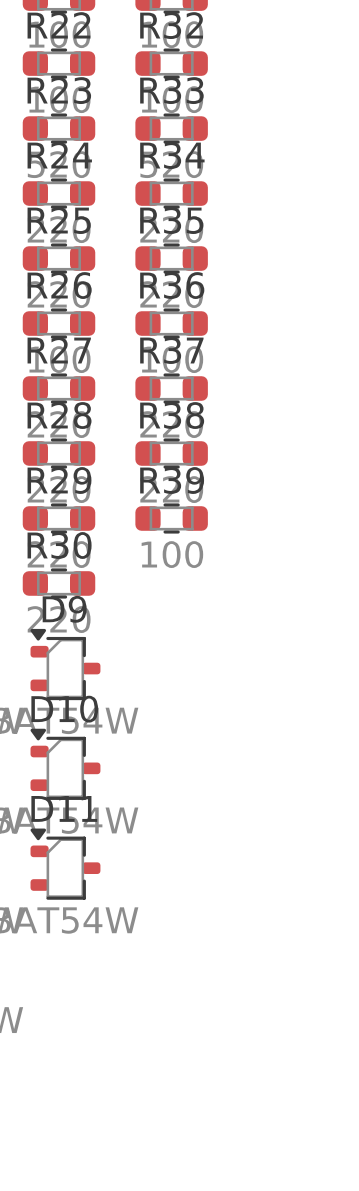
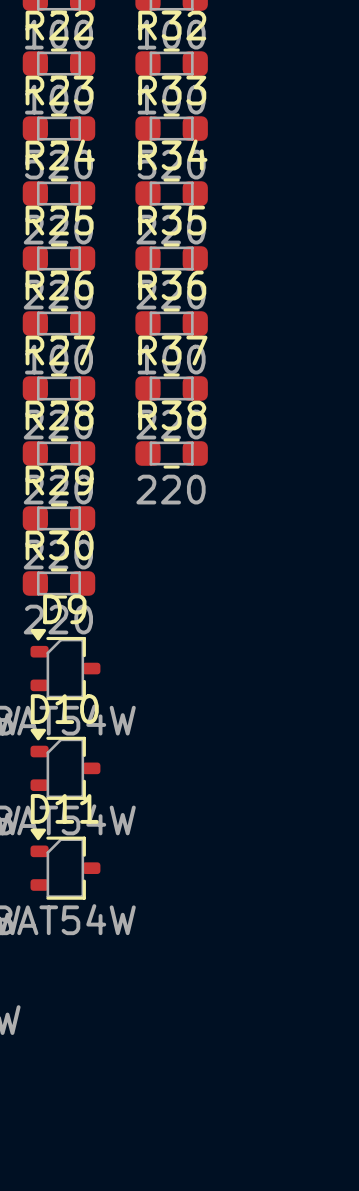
R39: 100 (171, 518) -> none

